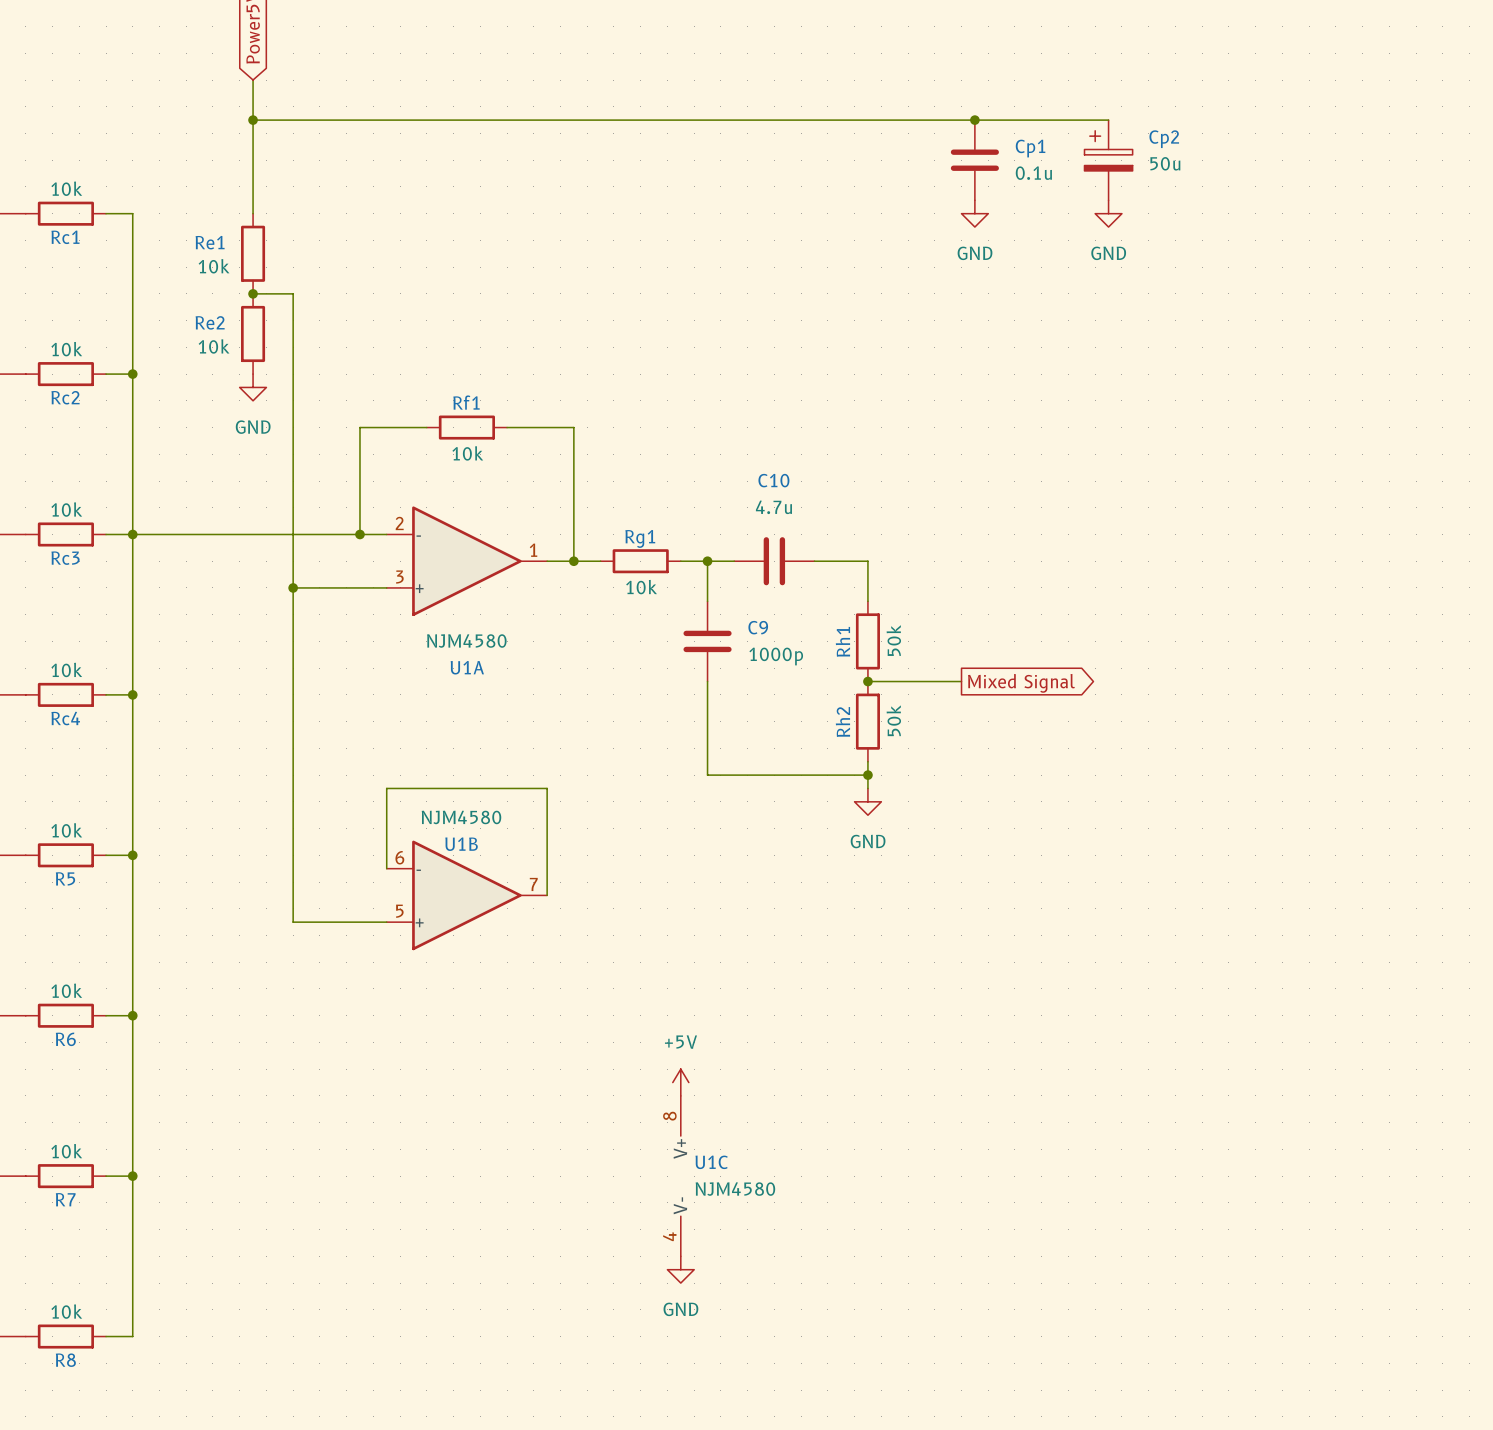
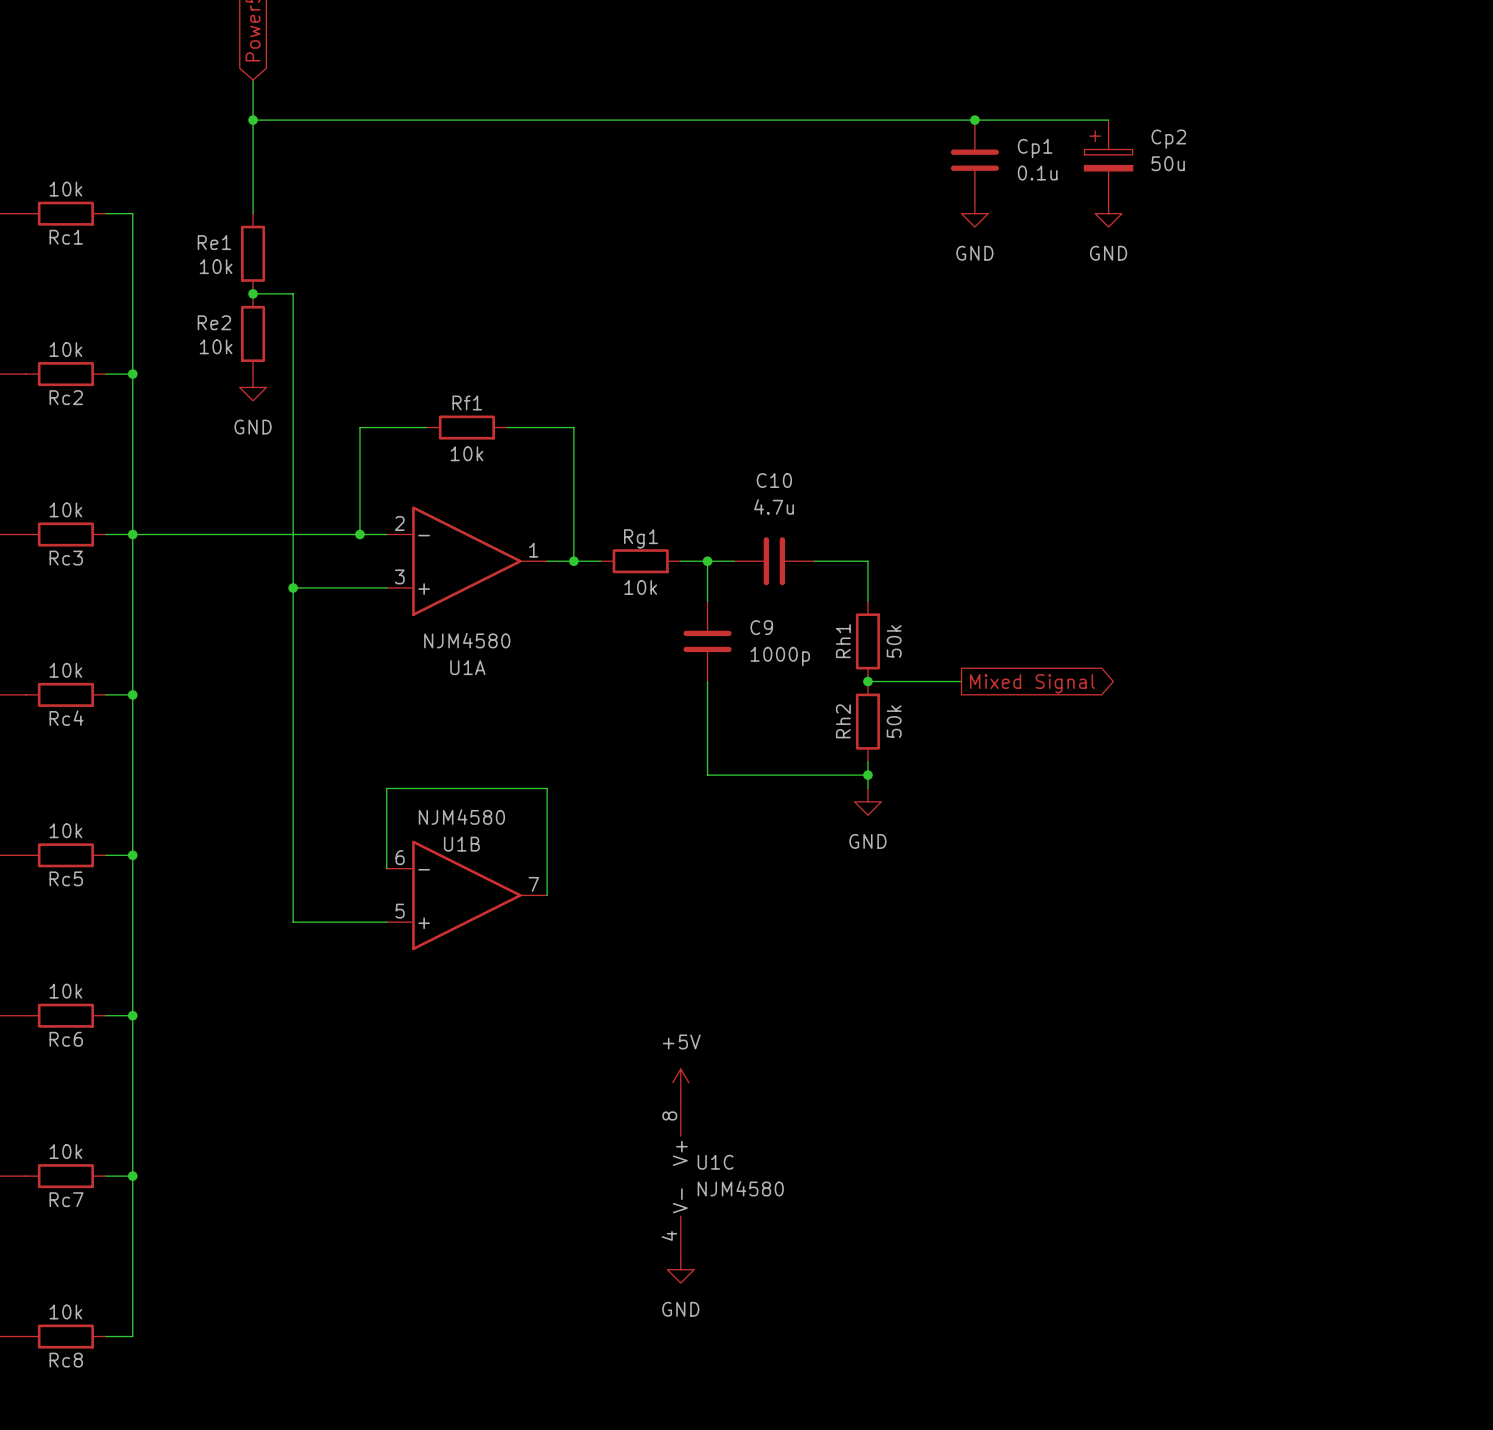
R5 name: R5 (65, 878) -> Rc5 (66, 878)
R6 name: R6 (65, 1039) -> Rc6 (66, 1039)
R7 name: R7 (65, 1199) -> Rc7 (66, 1199)
R8 name: R8 (65, 1360) -> Rc8 (66, 1360)

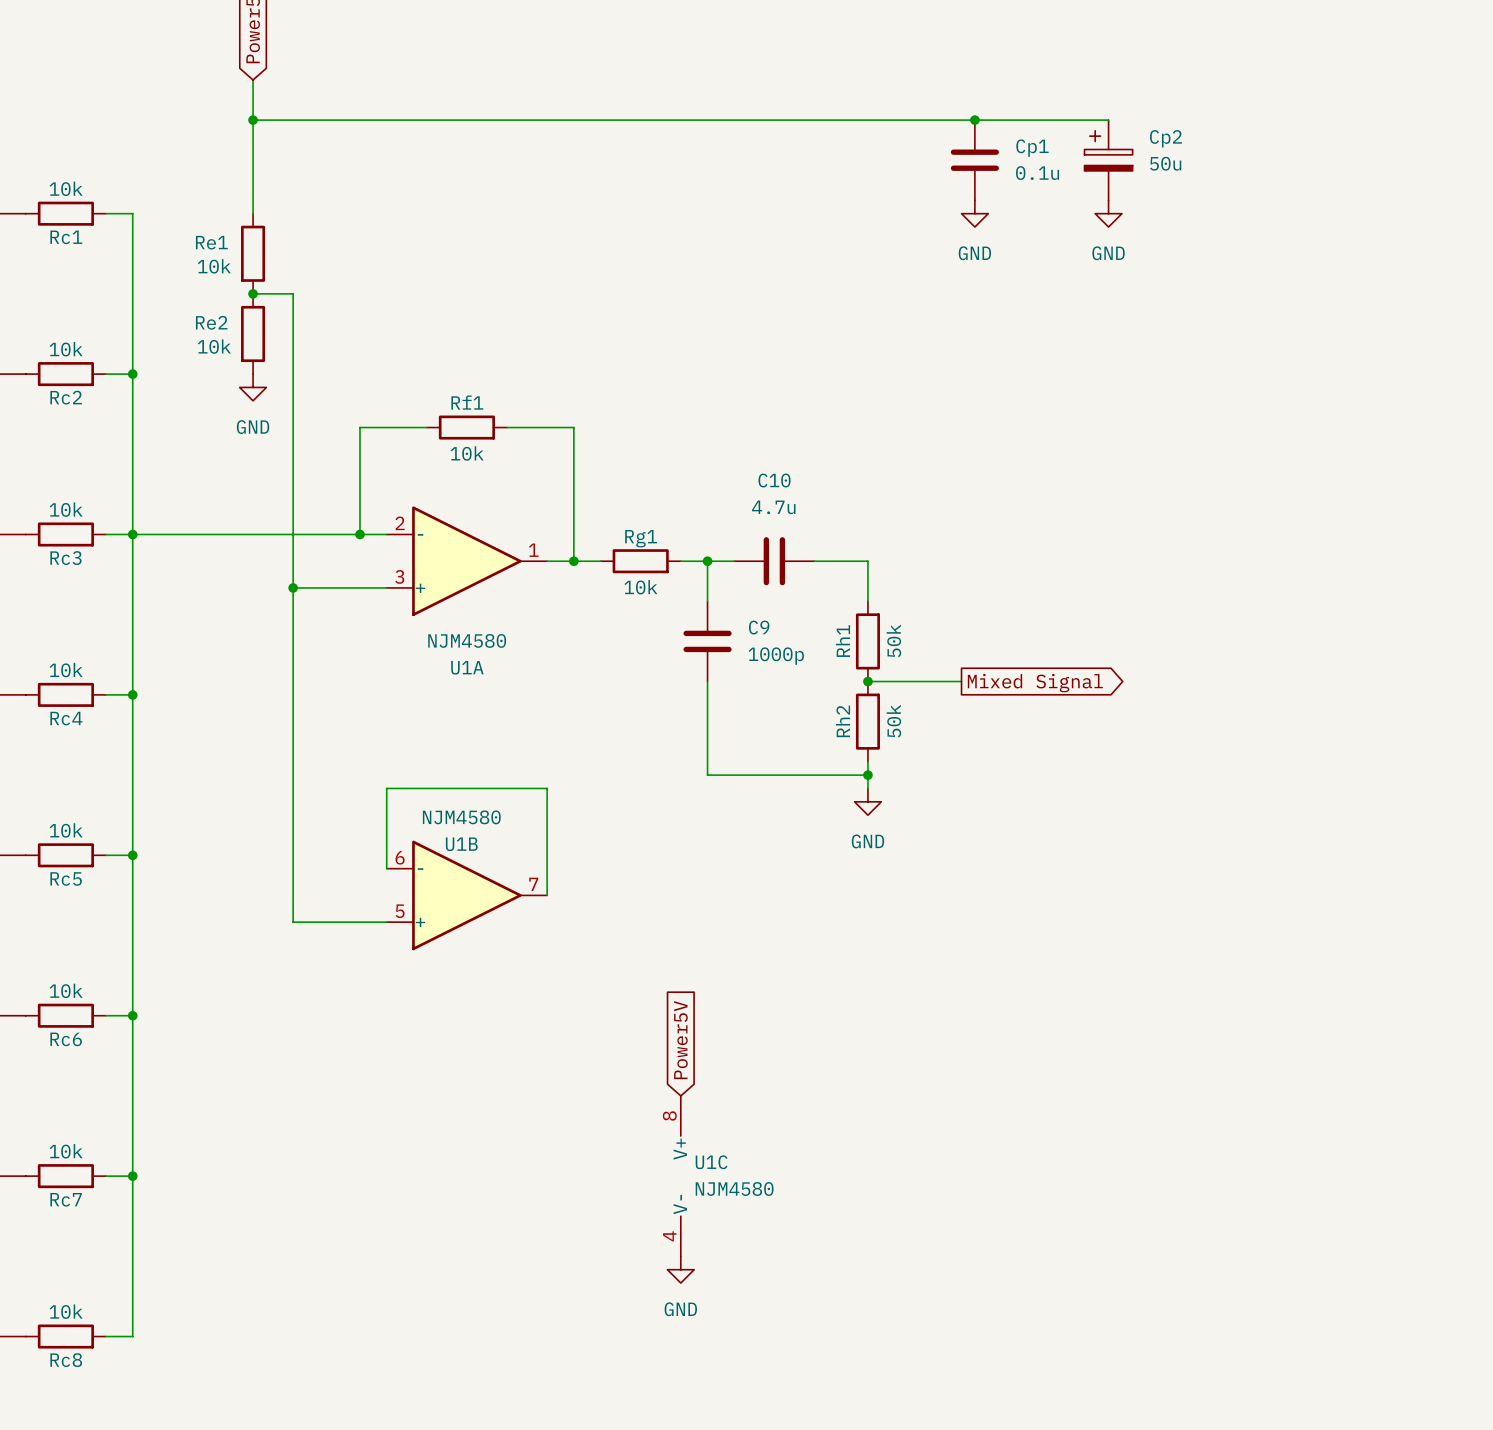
global label: none -> Power5V (680, 1040)
power symbol: +5V (680, 1082) -> none

